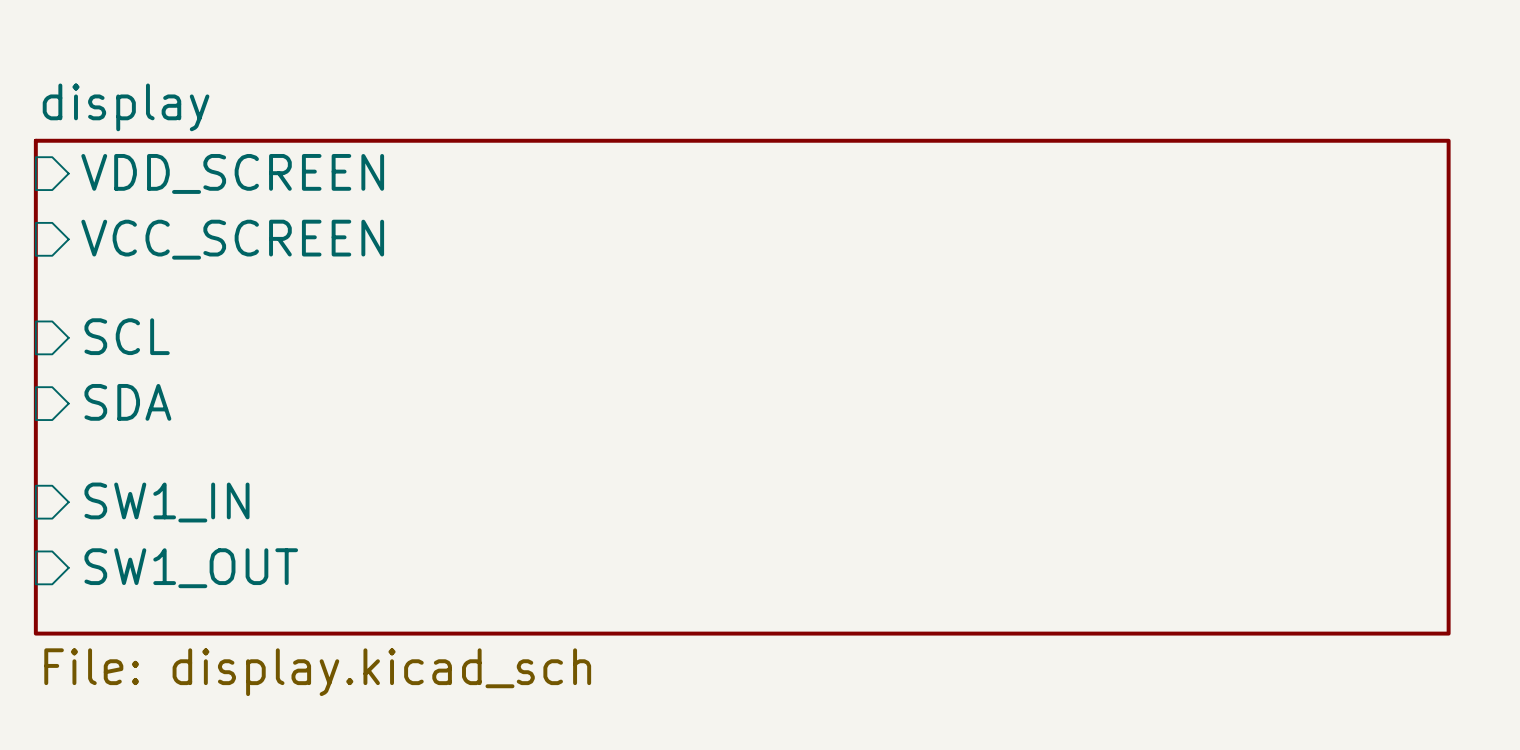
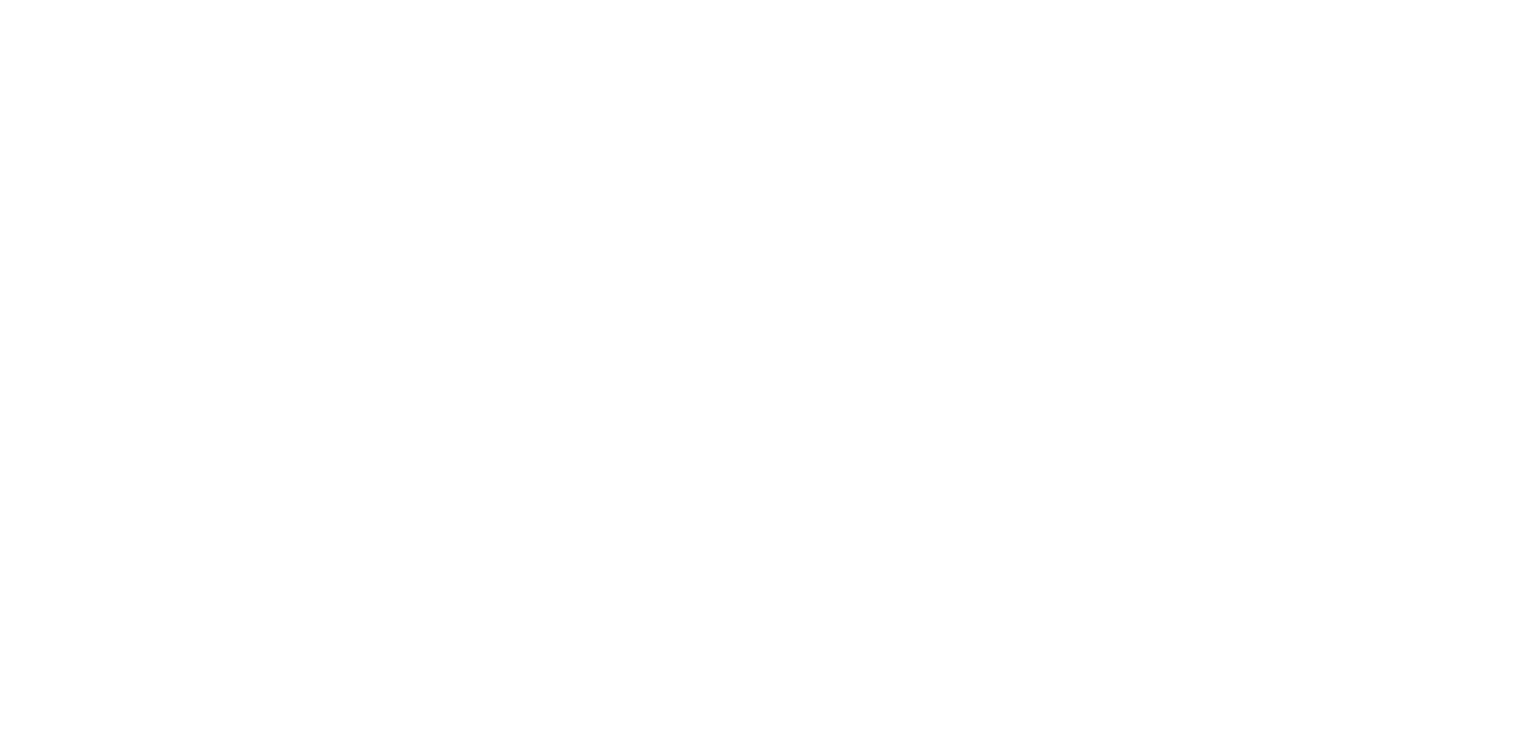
sheet pin: VDD_SCREEN (232, 173) -> none
sheet pin: VCC_SCREEN (232, 239) -> none
sheet pin: SCL (127, 336) -> none
sheet display: File: display.kicad_sch (742, 387) -> none
sheet pin: SDA (127, 402) -> none
sheet pin: SW1_IN (166, 502) -> none
sheet pin: SW1_OUT (191, 568) -> none

